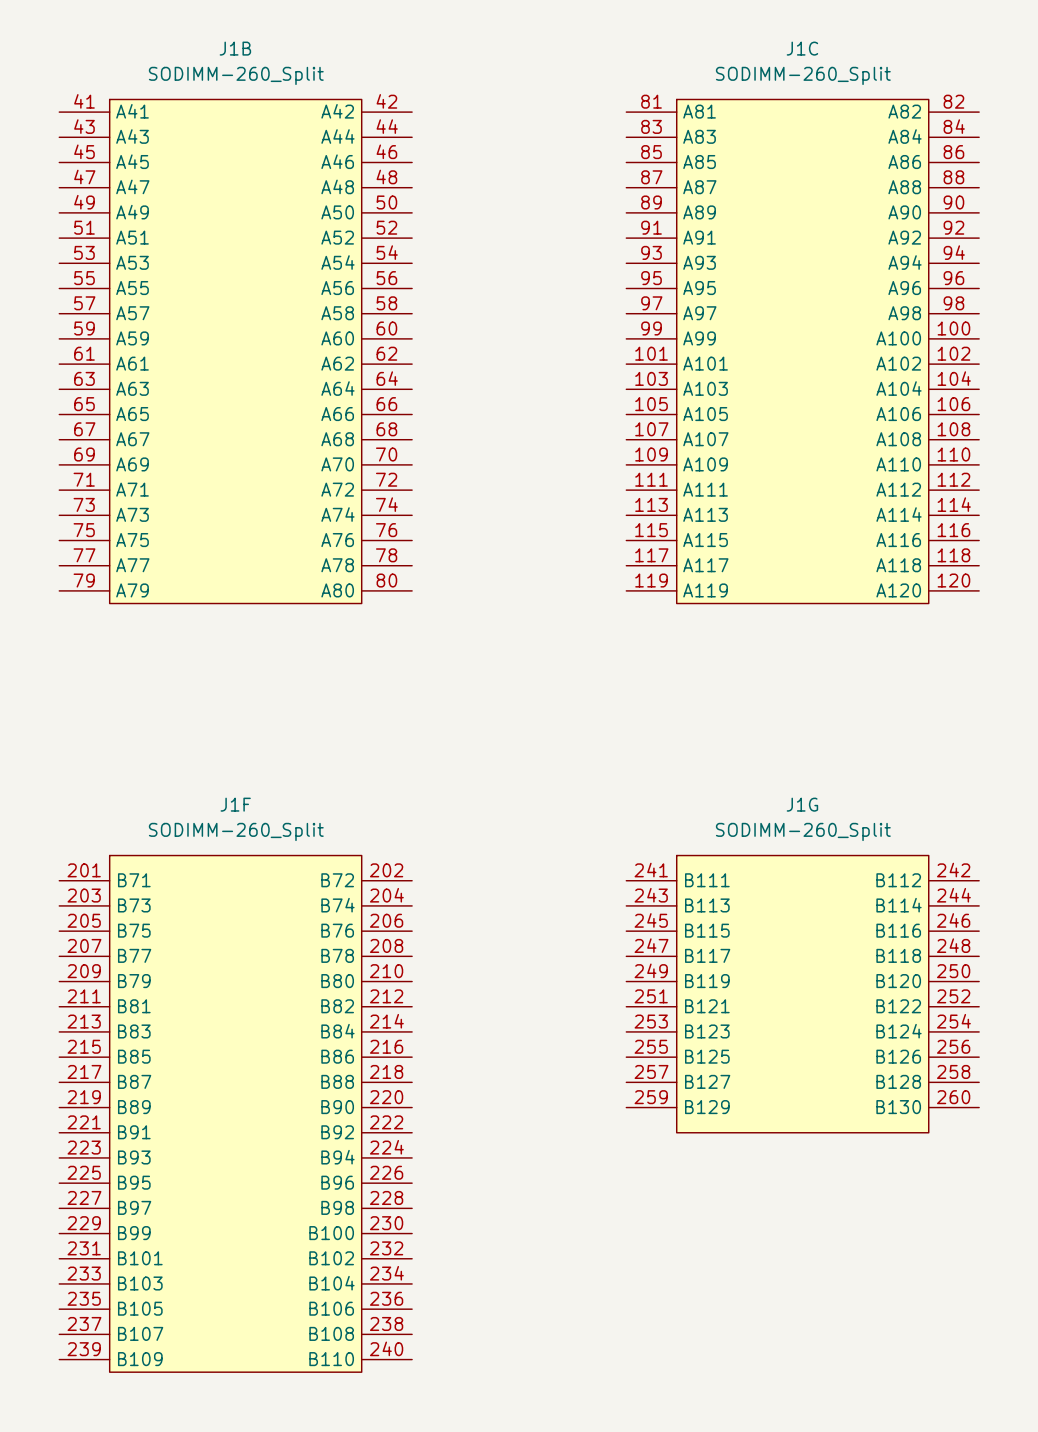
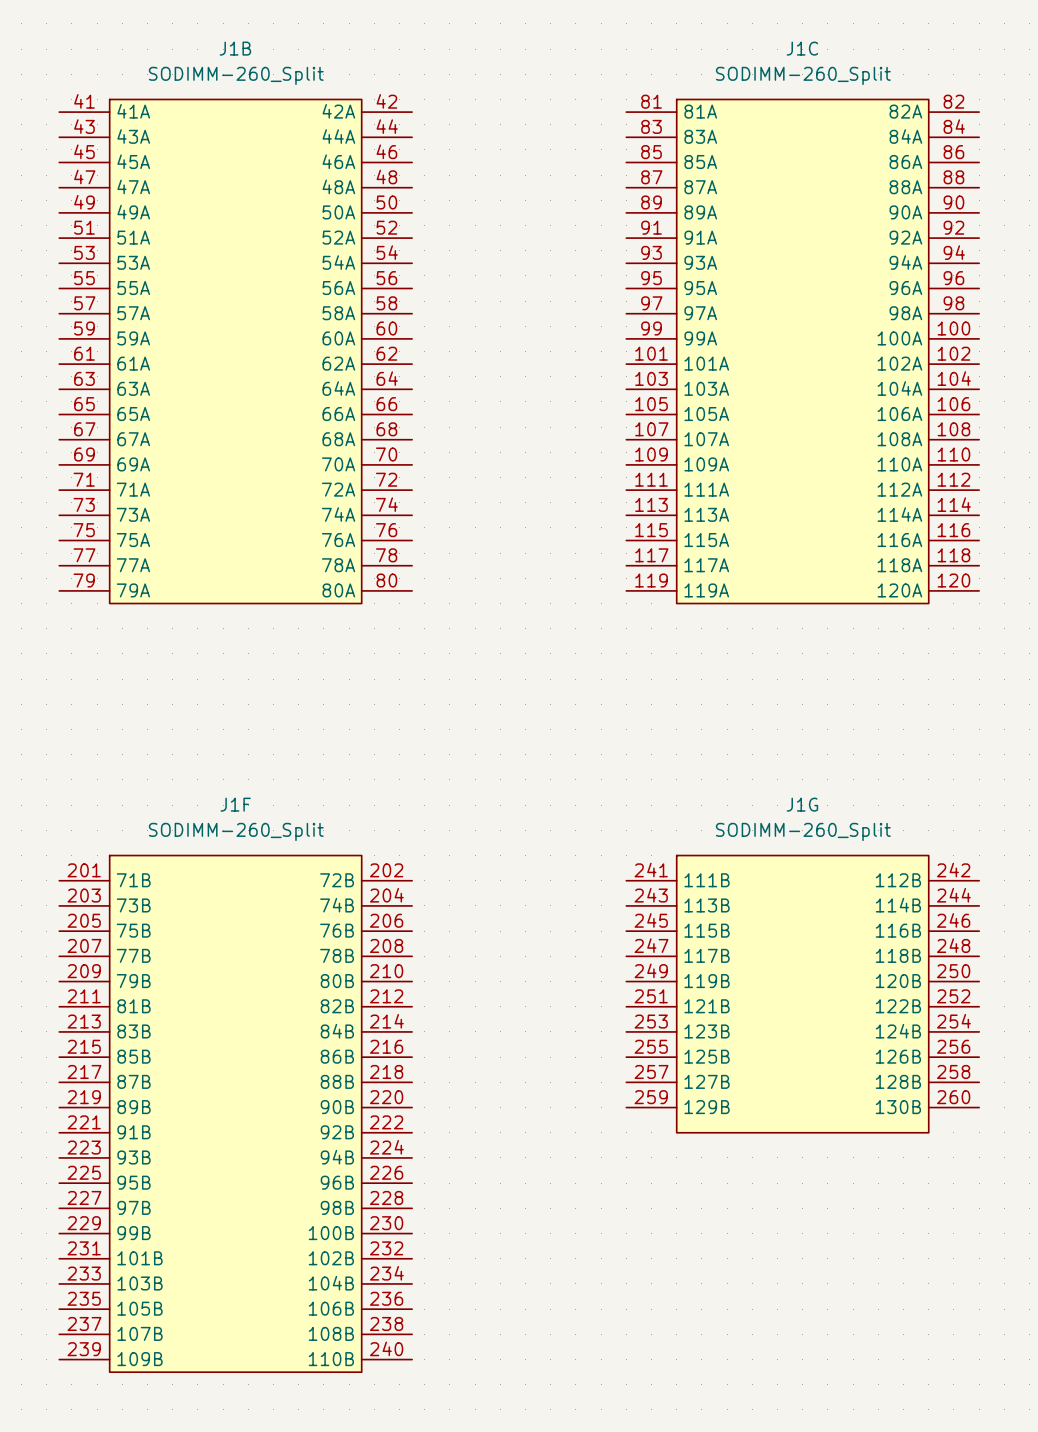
J1B symbol: [59, 99, 413, 604] -> [59, 99, 413, 604]
J1C symbol: [626, 99, 980, 604] -> [626, 99, 980, 604]
J1F symbol: [59, 855, 413, 1373] -> [59, 855, 413, 1373]
J1G symbol: [626, 855, 980, 1133] -> [626, 855, 980, 1133]

